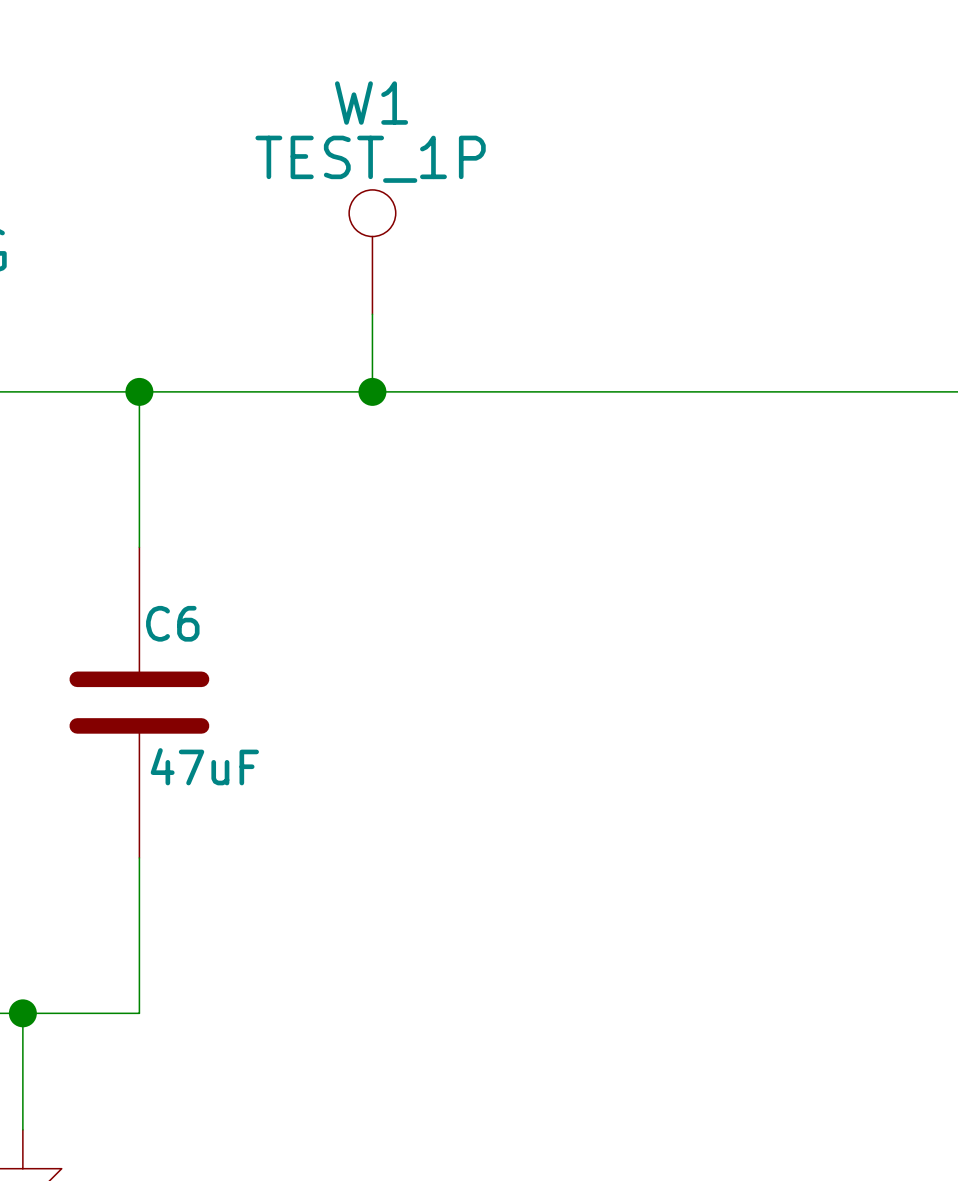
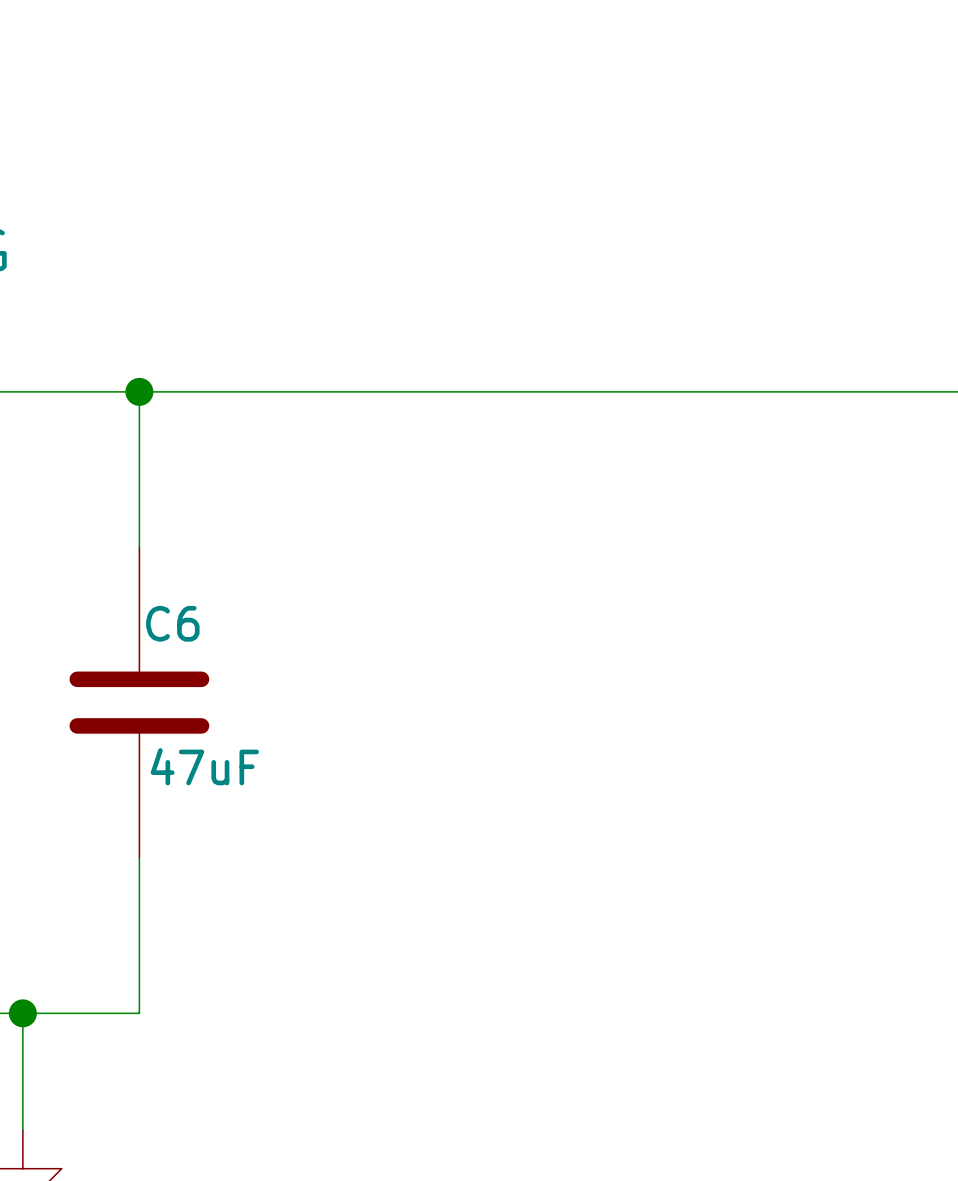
W1: TEST_1P (372, 252) -> none
wire: (372, 314) (372, 391) -> none
junction: (372, 391) -> none

